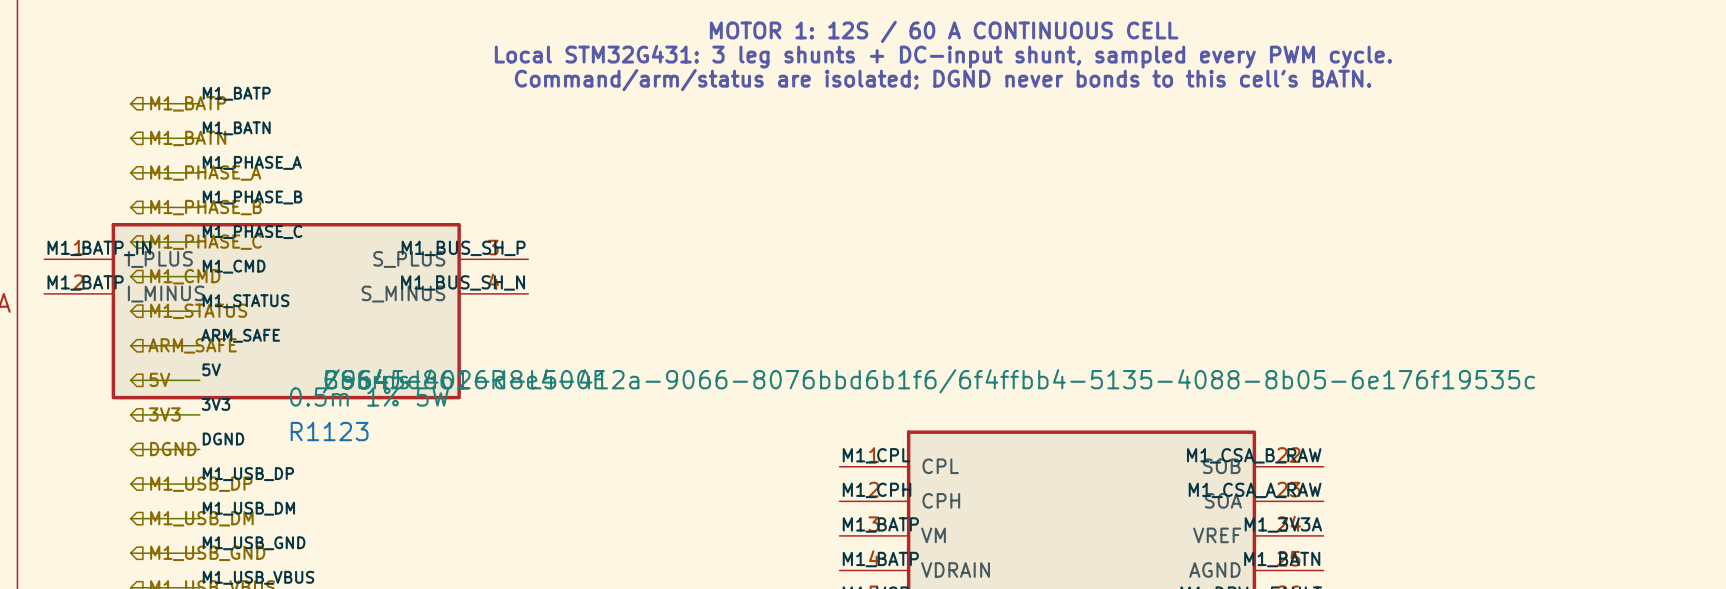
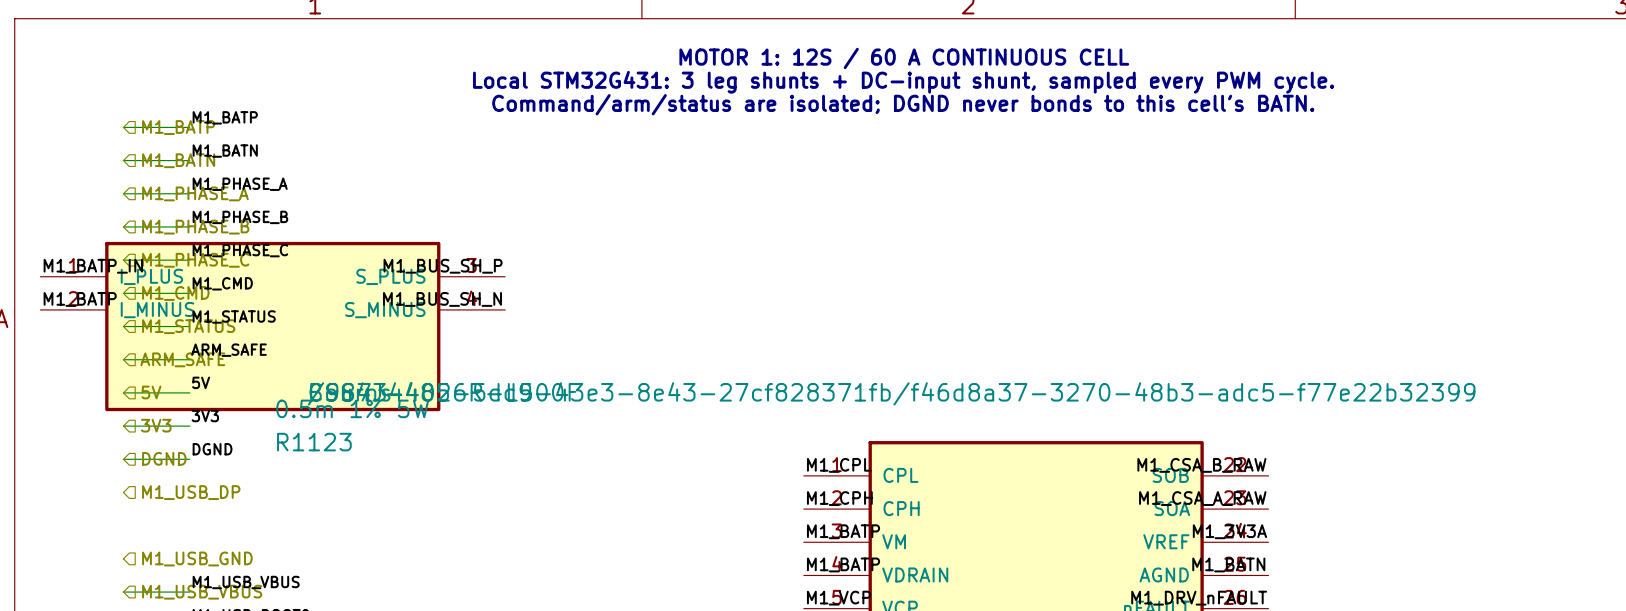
R1123 text: /9645d861-d8e4-412a-9066-8076bbd6b1f6/6f4ffbb4-5135-4088-8b05-6e176f19535c (928, 381) -> /98734485-5dd9-43e3-8e43-27cf828371fb/f46d8a37-3270-48b3-adc5-f77e22b32399 (891, 393)
label: M1_USB_DP (248, 474) -> none
wire: (130, 484) (199, 484) -> none
label: M1_USB_DM (248, 508) -> none
wire: (130, 518) (199, 518) -> none
hierarchical label: M1_USB_DM (201, 518) -> none
label: M1_USB_GND (254, 543) -> none
wire: (130, 553) (199, 553) -> none

